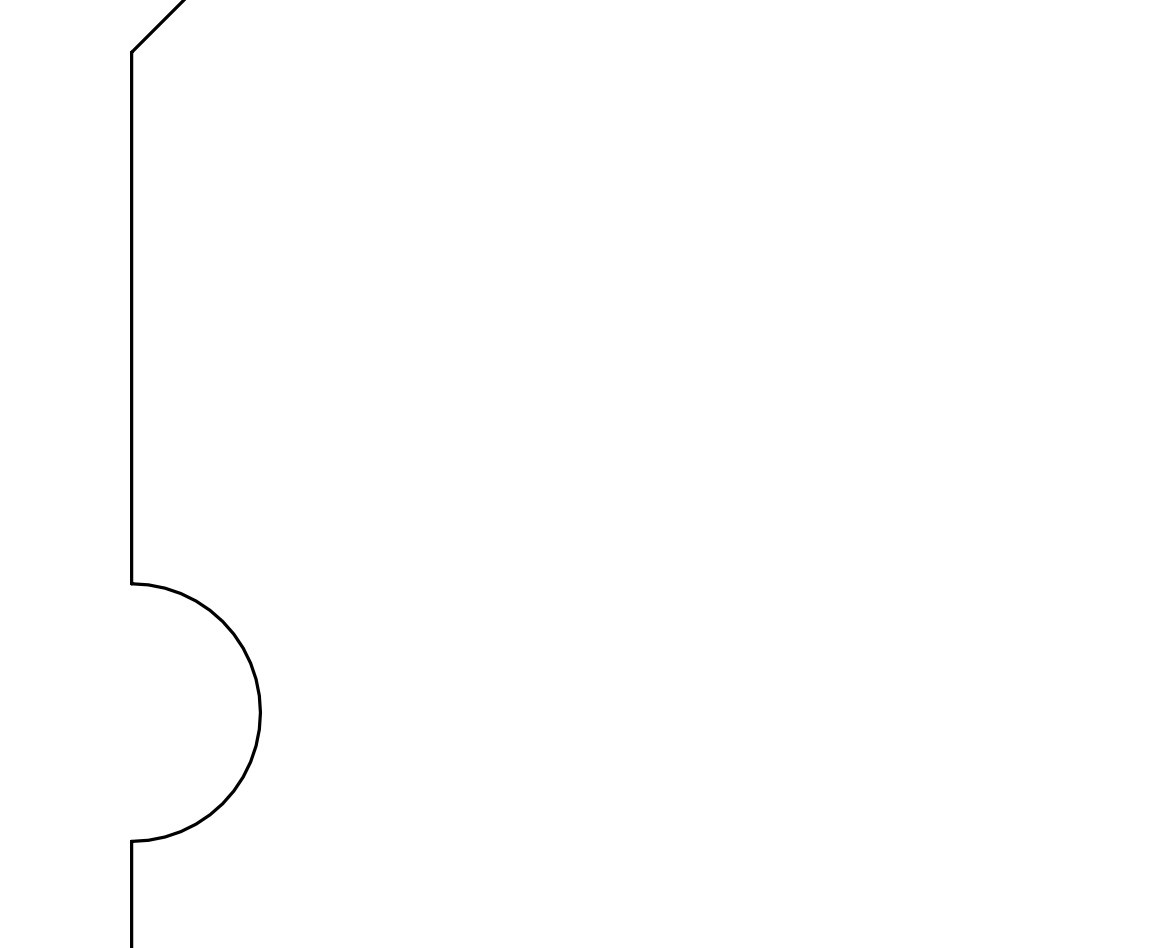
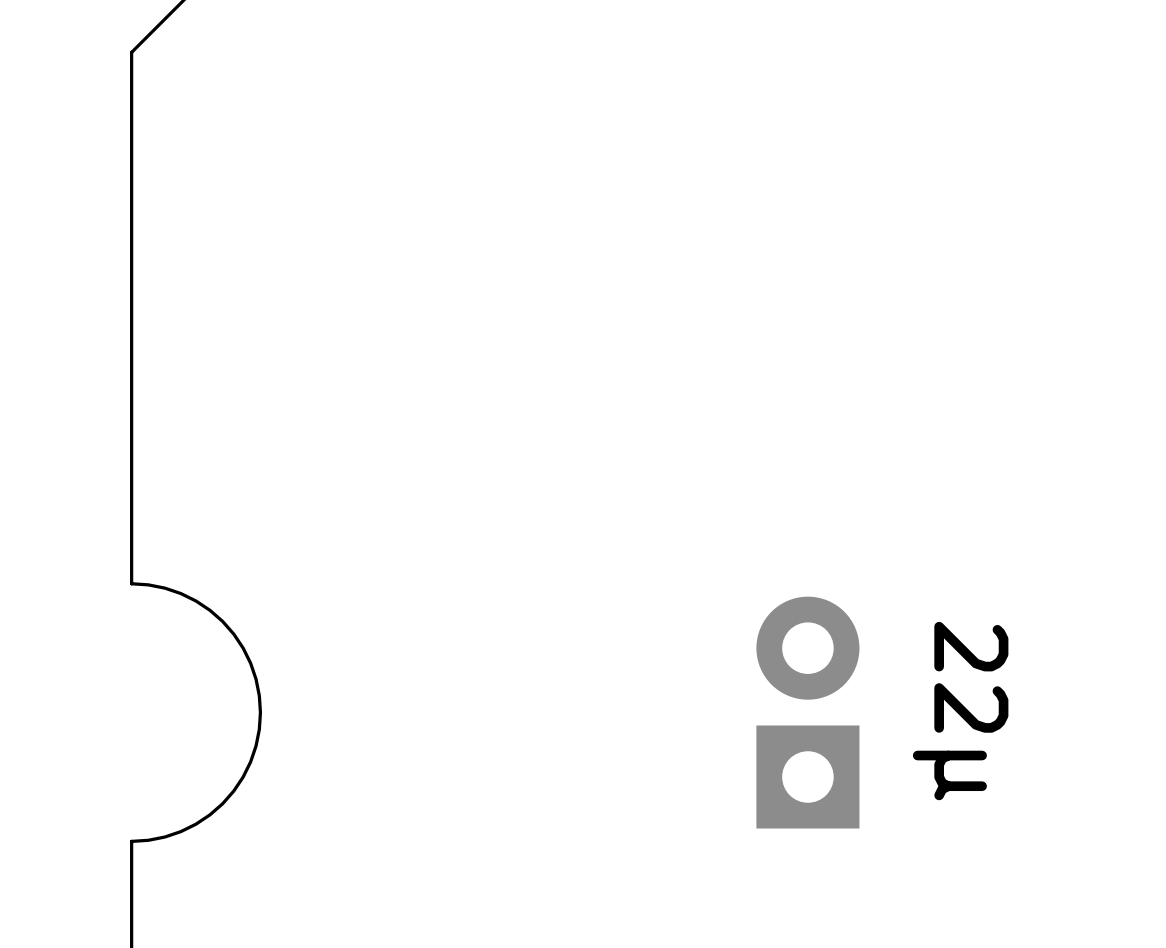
part: none -> 22µ (807, 712)

